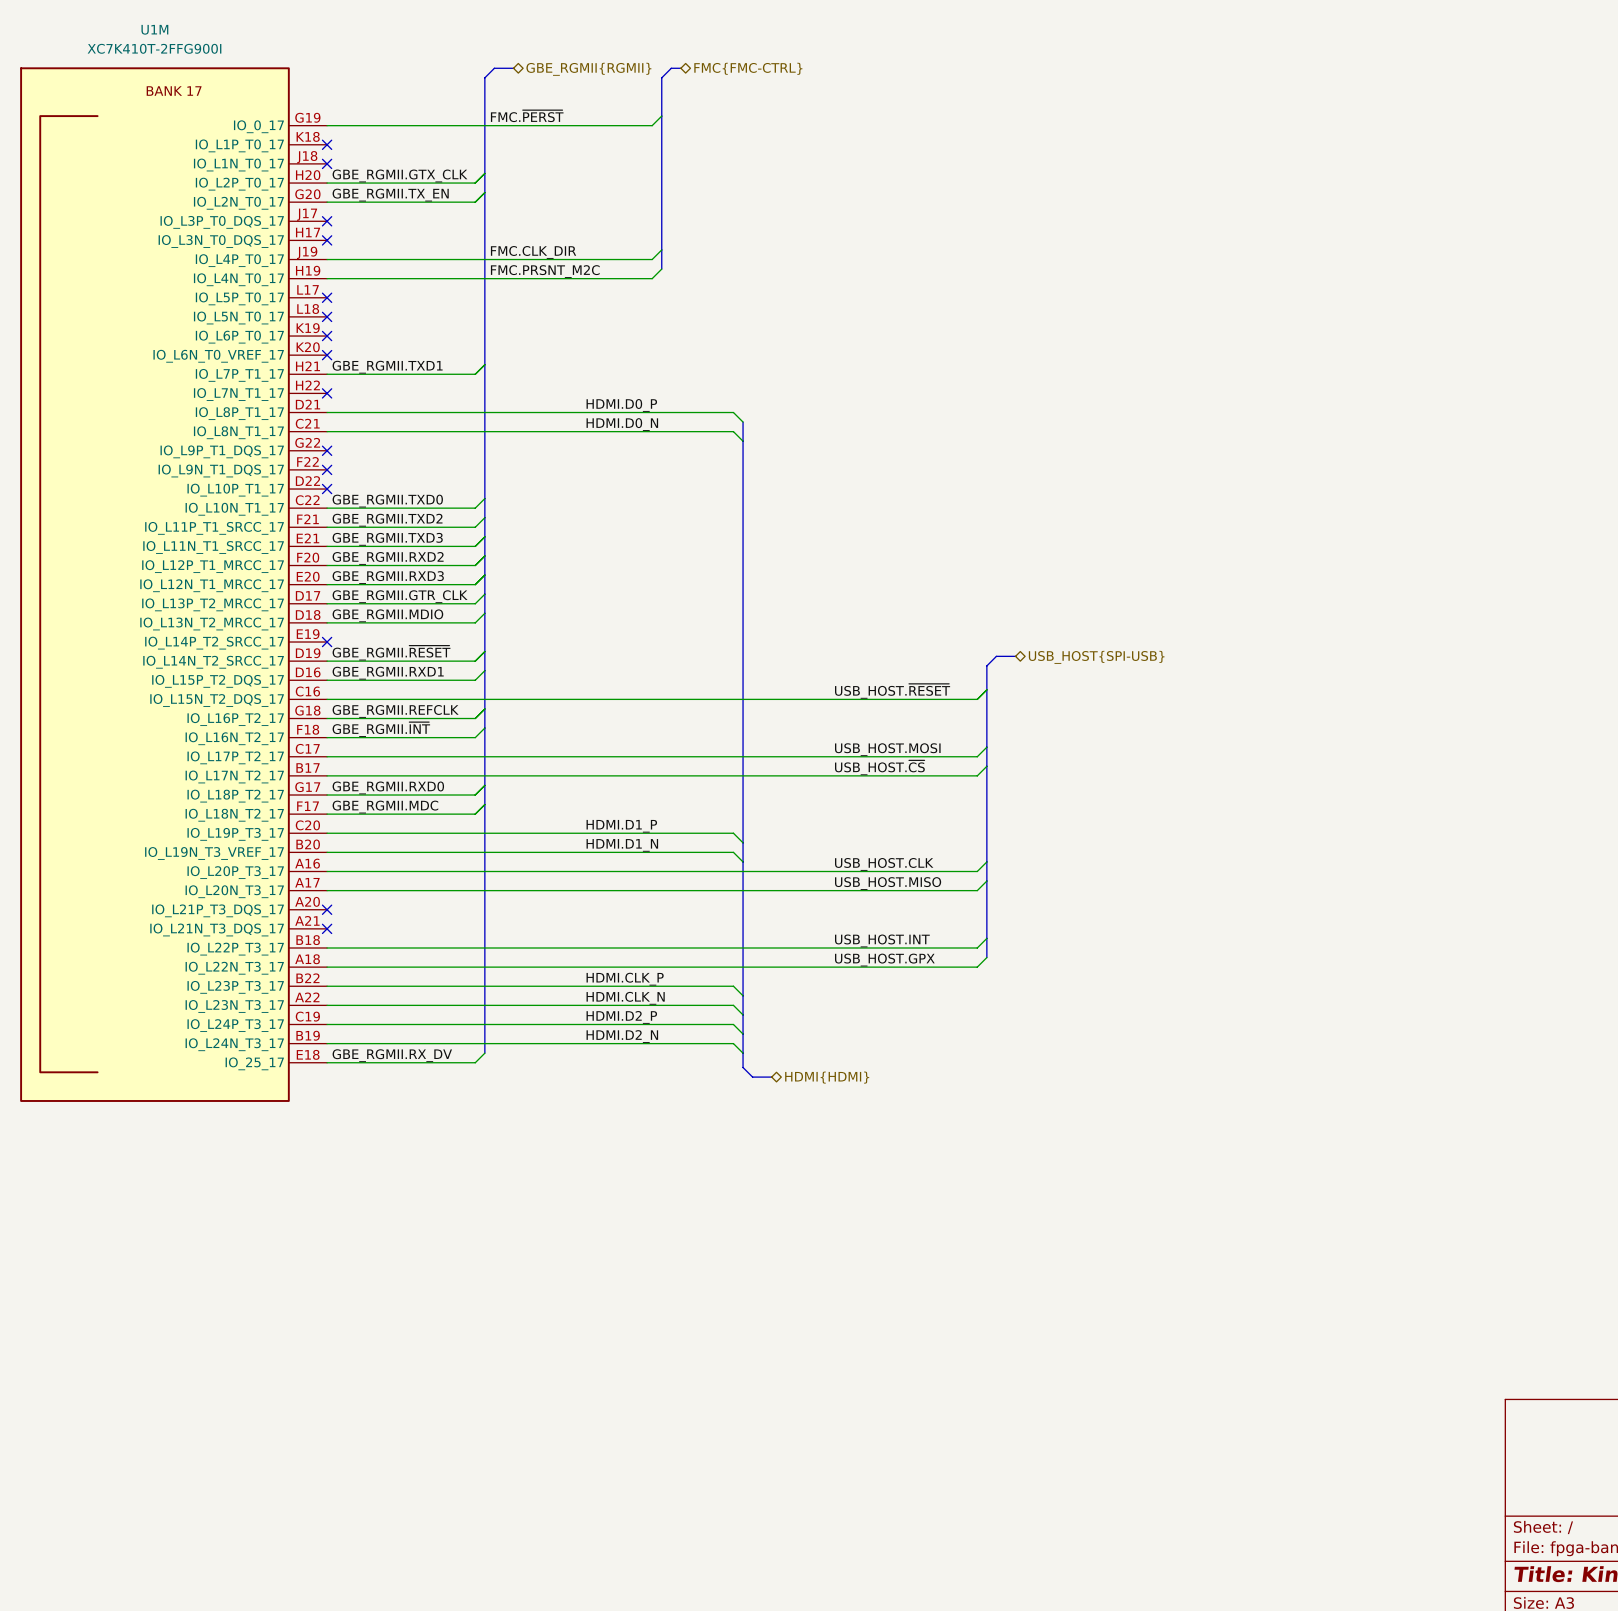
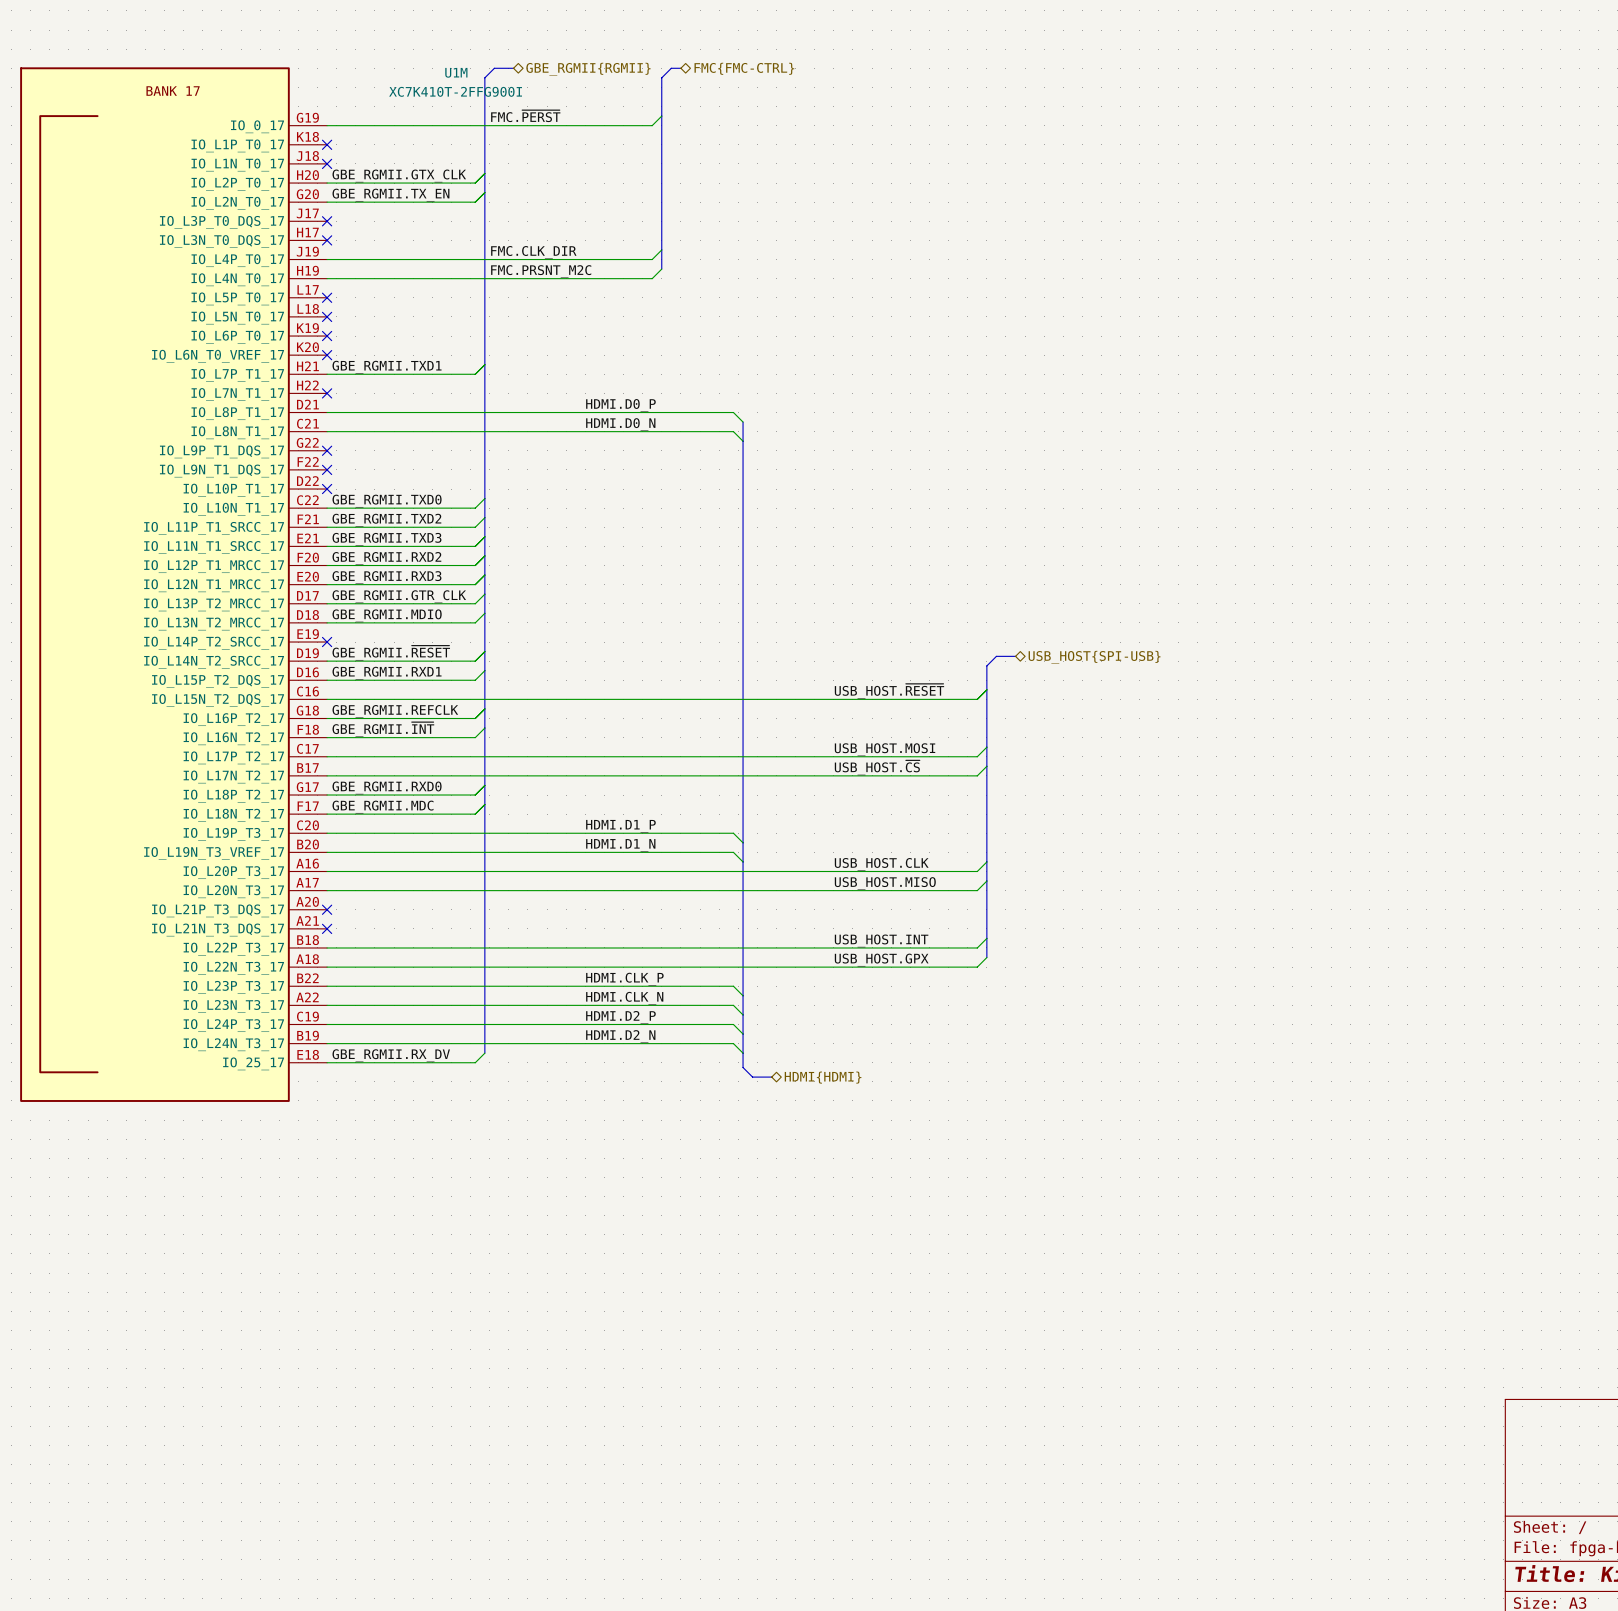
U1M name position: U1M (154, 29) -> U1M (456, 72)
U1M value position: XC7K410T-2FFG900I (154, 48) -> XC7K410T-2FFG900I (455, 91)

